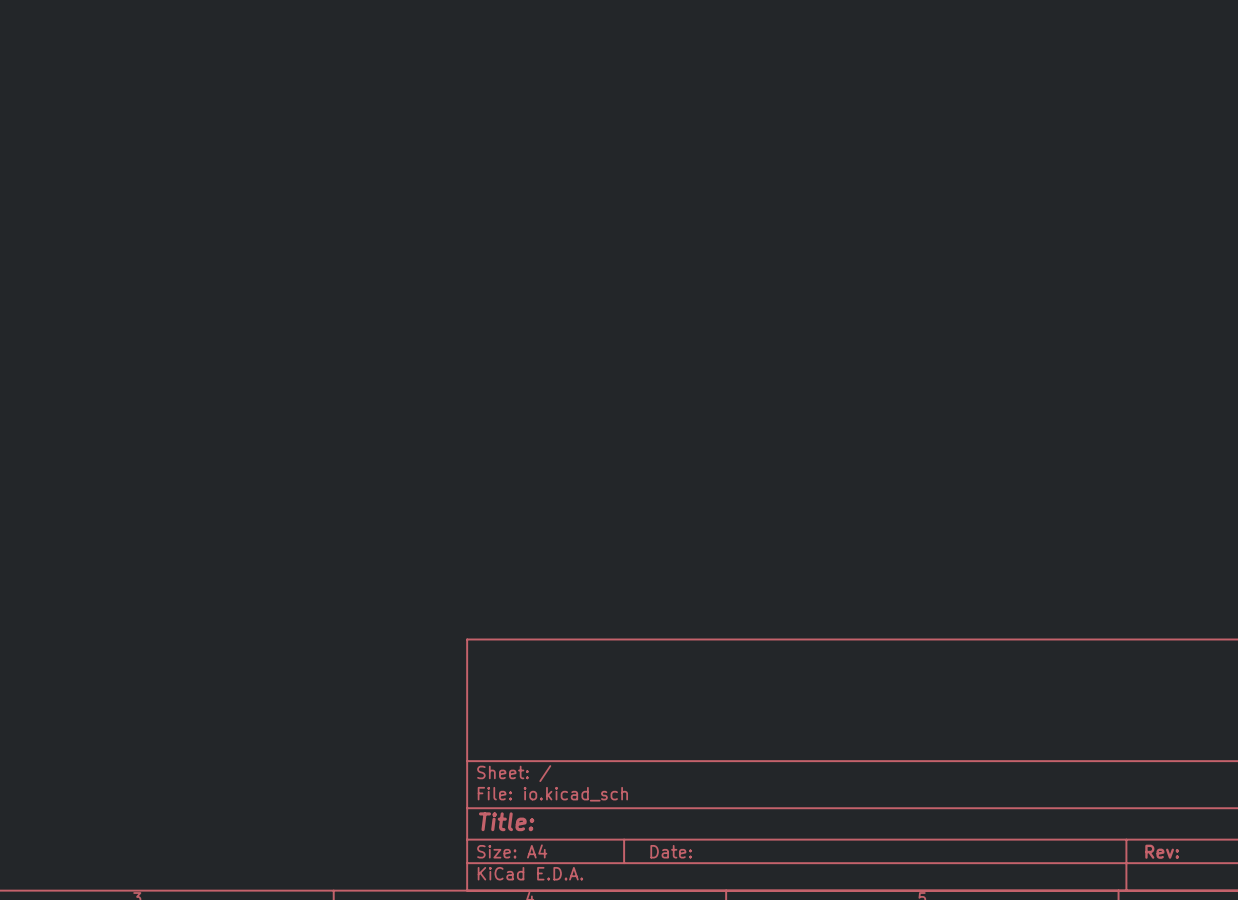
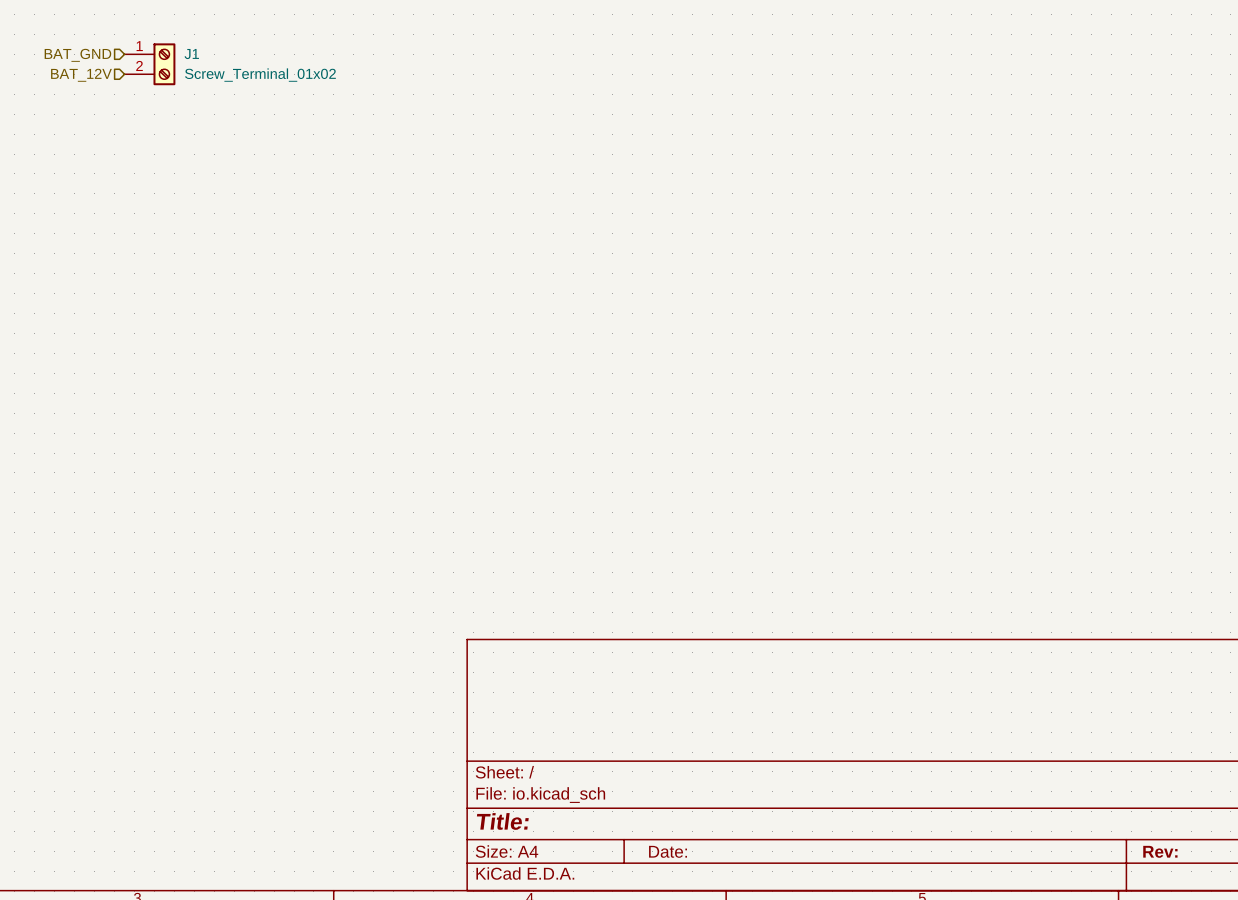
hierarchical label: none -> BAT_GND (77, 55)
J1: none -> Screw_Terminal_01x02 (149, 64)
hierarchical label: none -> BAT_12V (81, 75)

